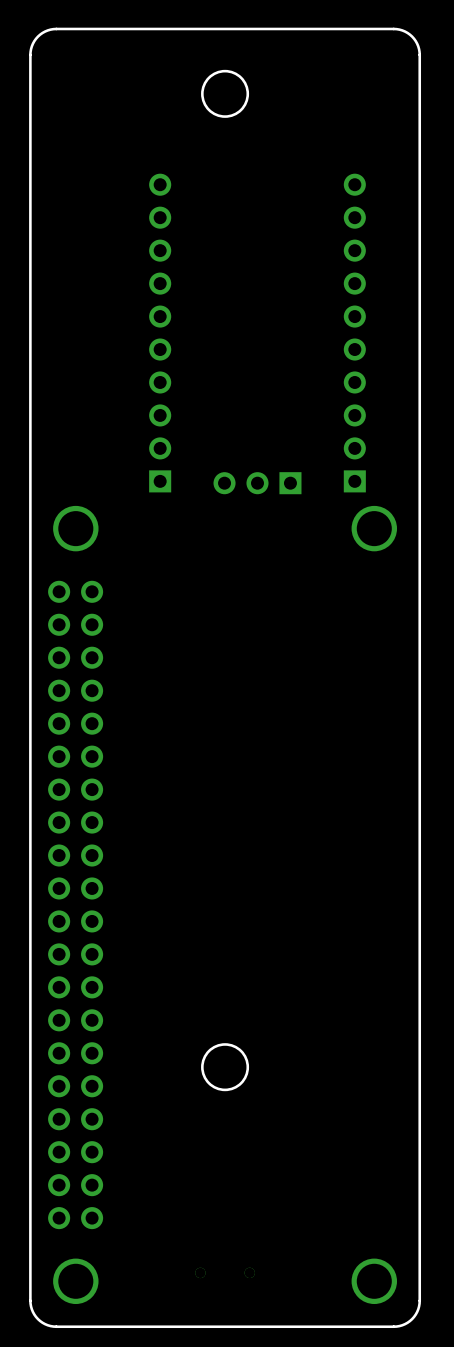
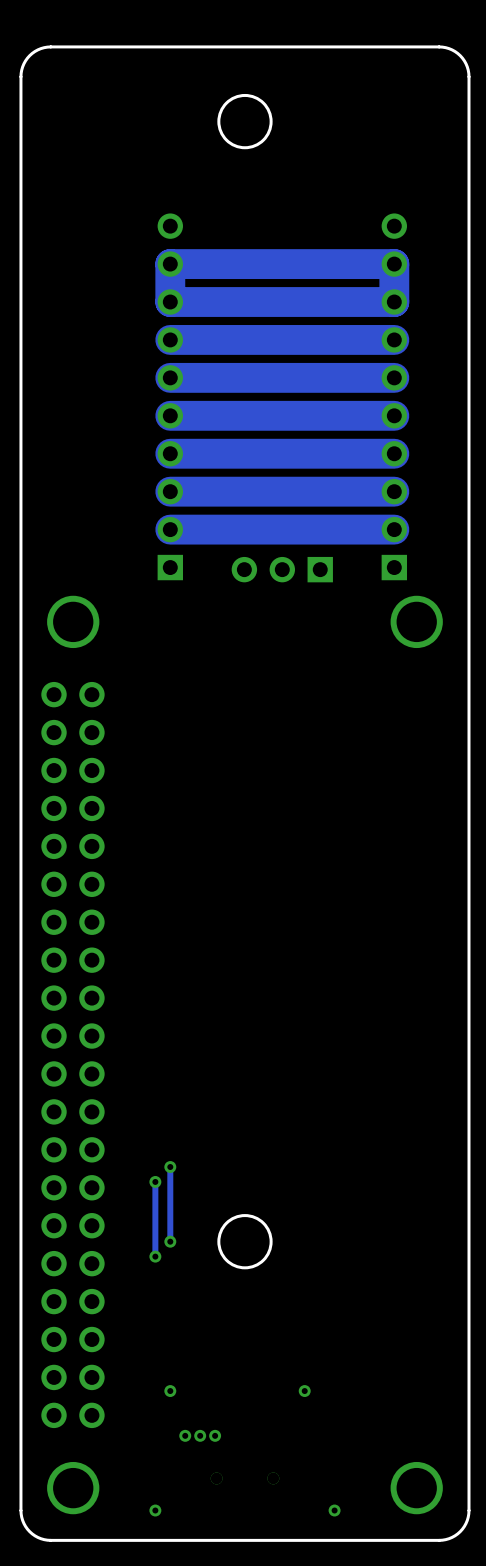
track: none -> (394, 264) (170, 264) (170, 302) (394, 302) (394, 264)
track: none -> (394, 339) (170, 339)
track: none -> (394, 377) (170, 377)
track: none -> (394, 415) (170, 415)
track: none -> (394, 453) (170, 453)
track: none -> (394, 491) (170, 491)
track: none -> (394, 529) (170, 529)
track: none -> (170, 1167) (170, 1241)
via: none -> (170, 1167)
track: none -> (155, 1181) (155, 1256)
via: none -> (155, 1181)
via: none -> (170, 1241)
via: none -> (155, 1256)
via: none -> (170, 1391)
via: none -> (304, 1391)
via: none -> (185, 1435)
via: none -> (200, 1435)
via: none -> (215, 1435)
via: none -> (155, 1510)
via: none -> (334, 1510)

